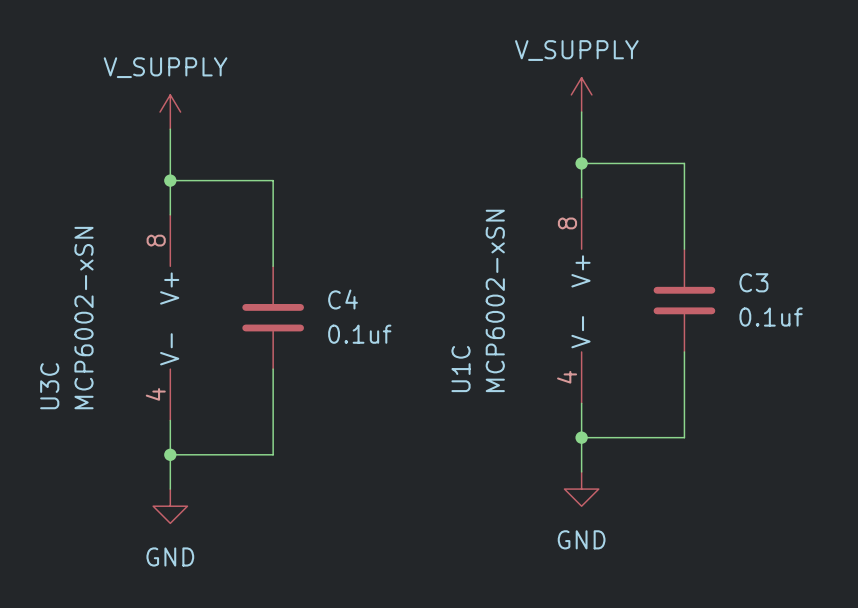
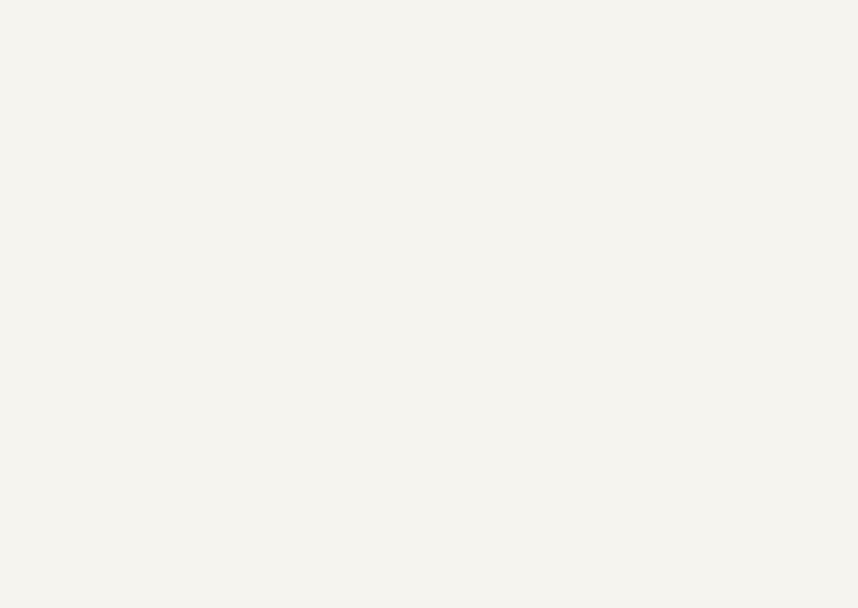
power symbol: V_SUPPLY (581, 94) -> none
power symbol: V_SUPPLY (170, 112) -> none
wire: (581, 112) (581, 197) -> none
wire: (170, 129) (170, 214) -> none
wire: (581, 163) (684, 163) (684, 249) -> none
junction: (581, 163) -> none
wire: (170, 180) (273, 180) (273, 266) -> none
junction: (170, 180) -> none
U1C: MCP6002-xSN (581, 300) -> none
C3: 0.1uf (684, 300) -> none
U3C: MCP6002-xSN (170, 317) -> none
C4: 0.1uf (273, 317) -> none
wire: (684, 351) (684, 437) (581, 437) -> none
wire: (273, 369) (273, 454) (170, 454) -> none
wire: (581, 403) (581, 471) -> none
wire: (170, 420) (170, 489) -> none
junction: (581, 437) -> none
junction: (170, 454) -> none
power symbol: GND (581, 489) -> none
power symbol: GND (170, 506) -> none

